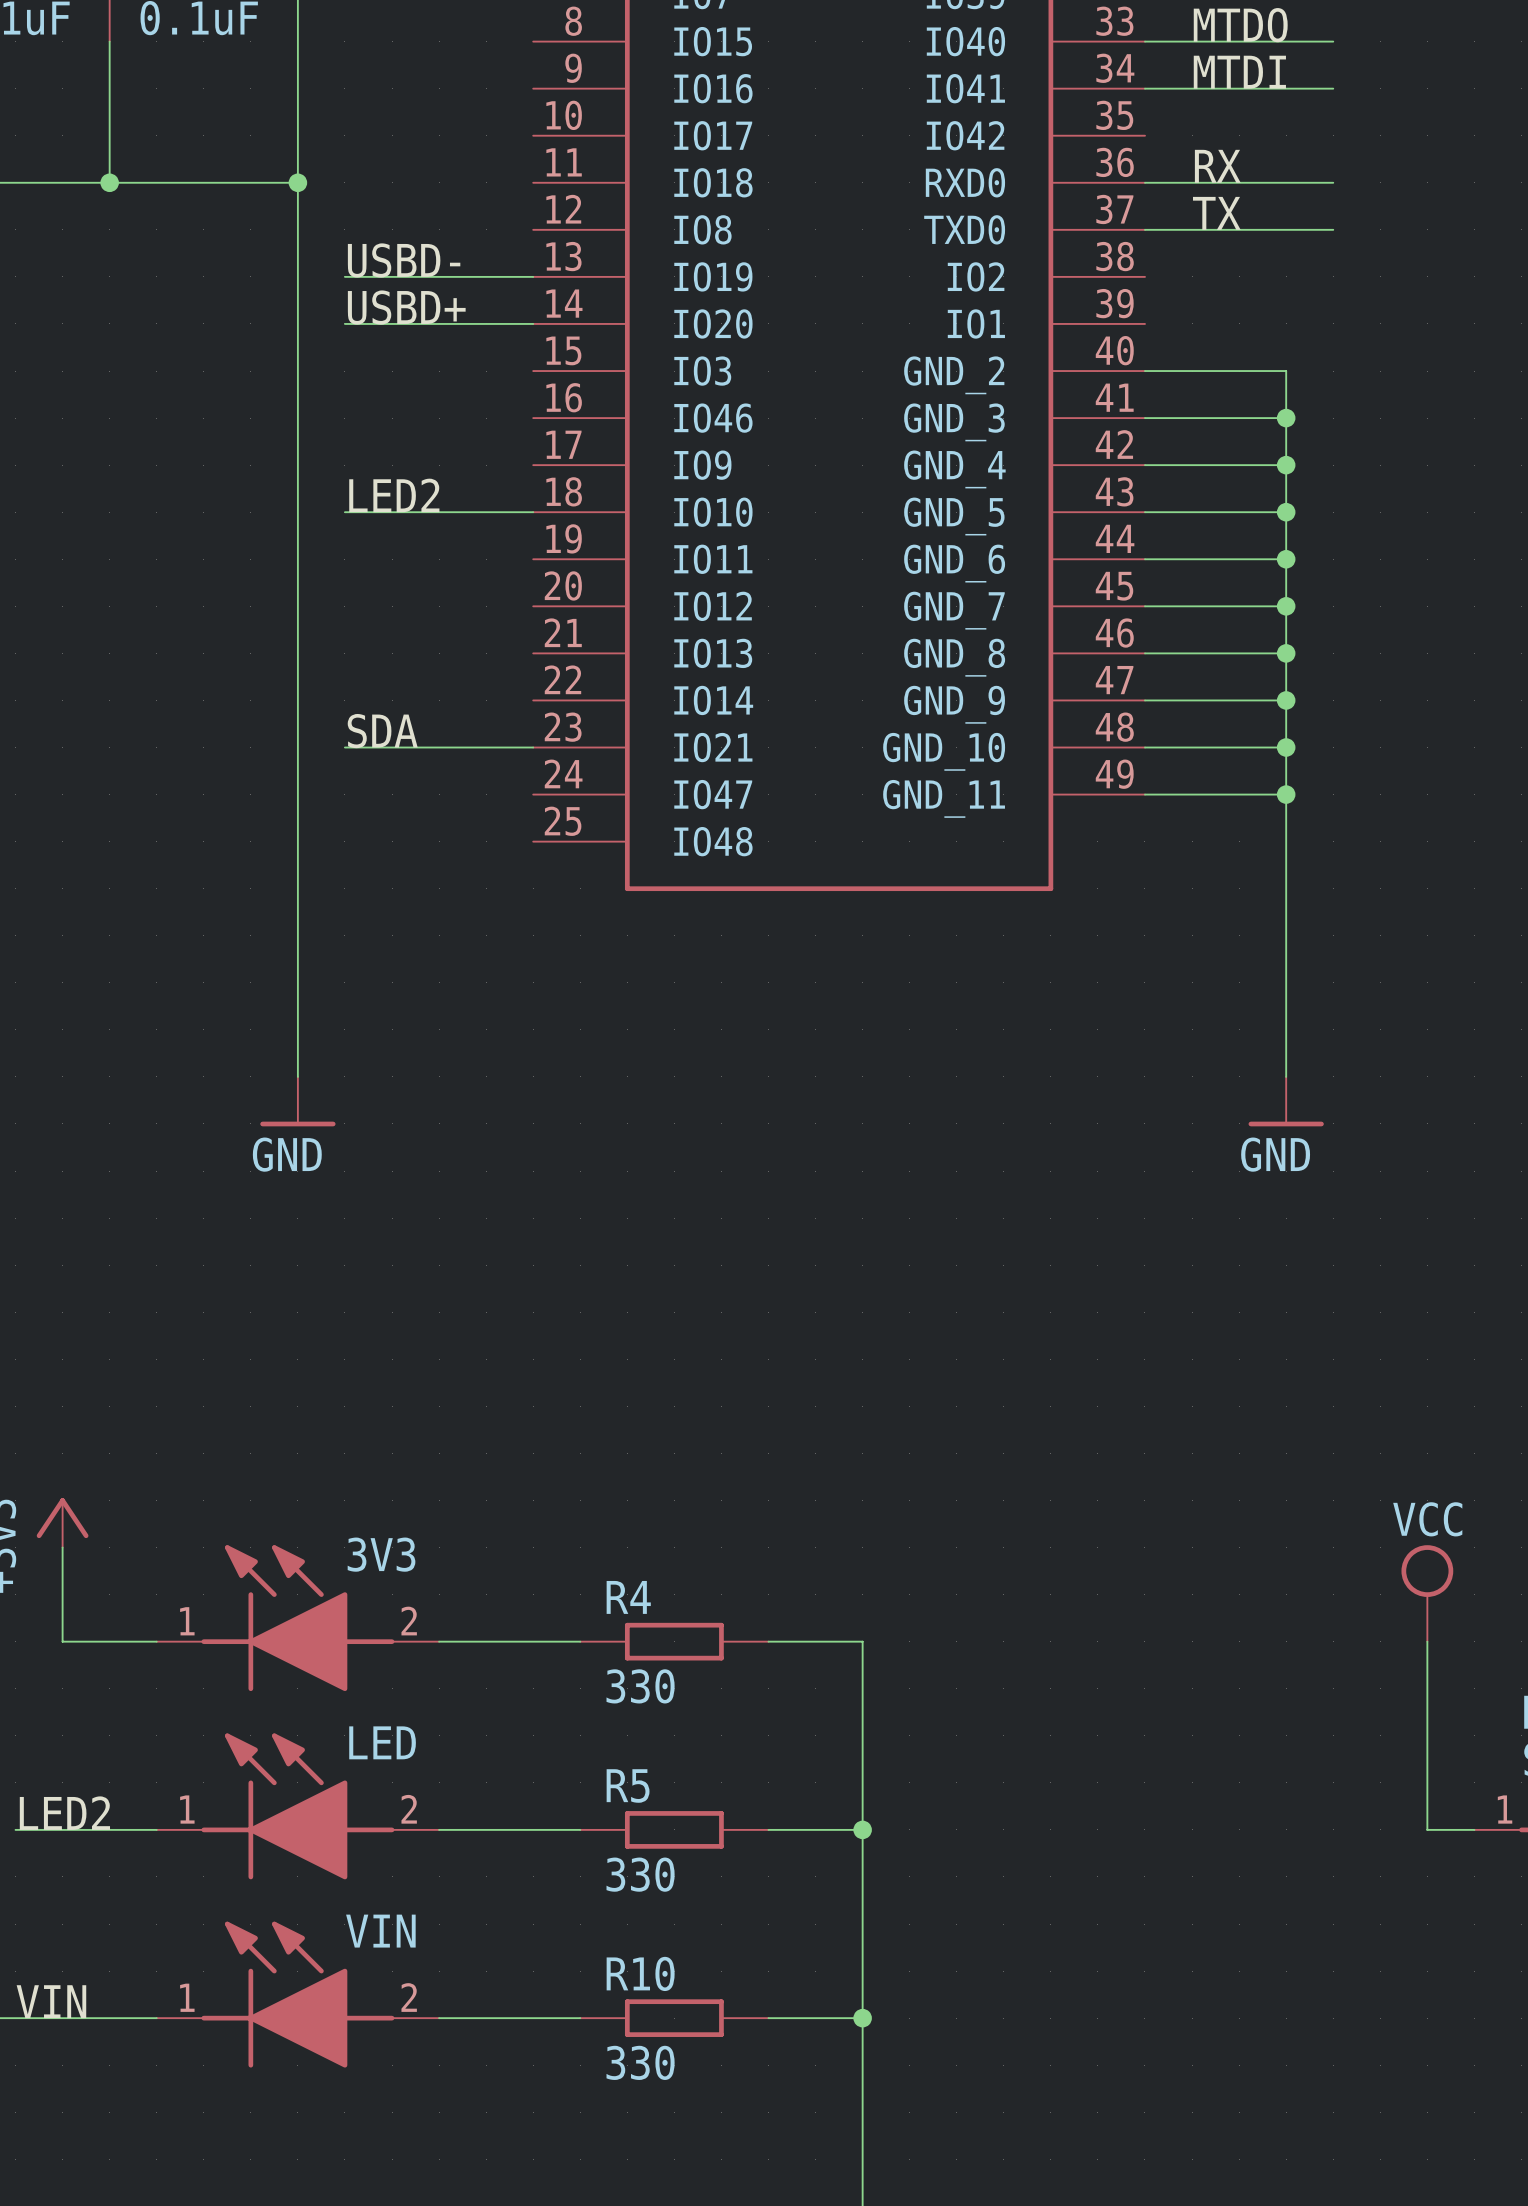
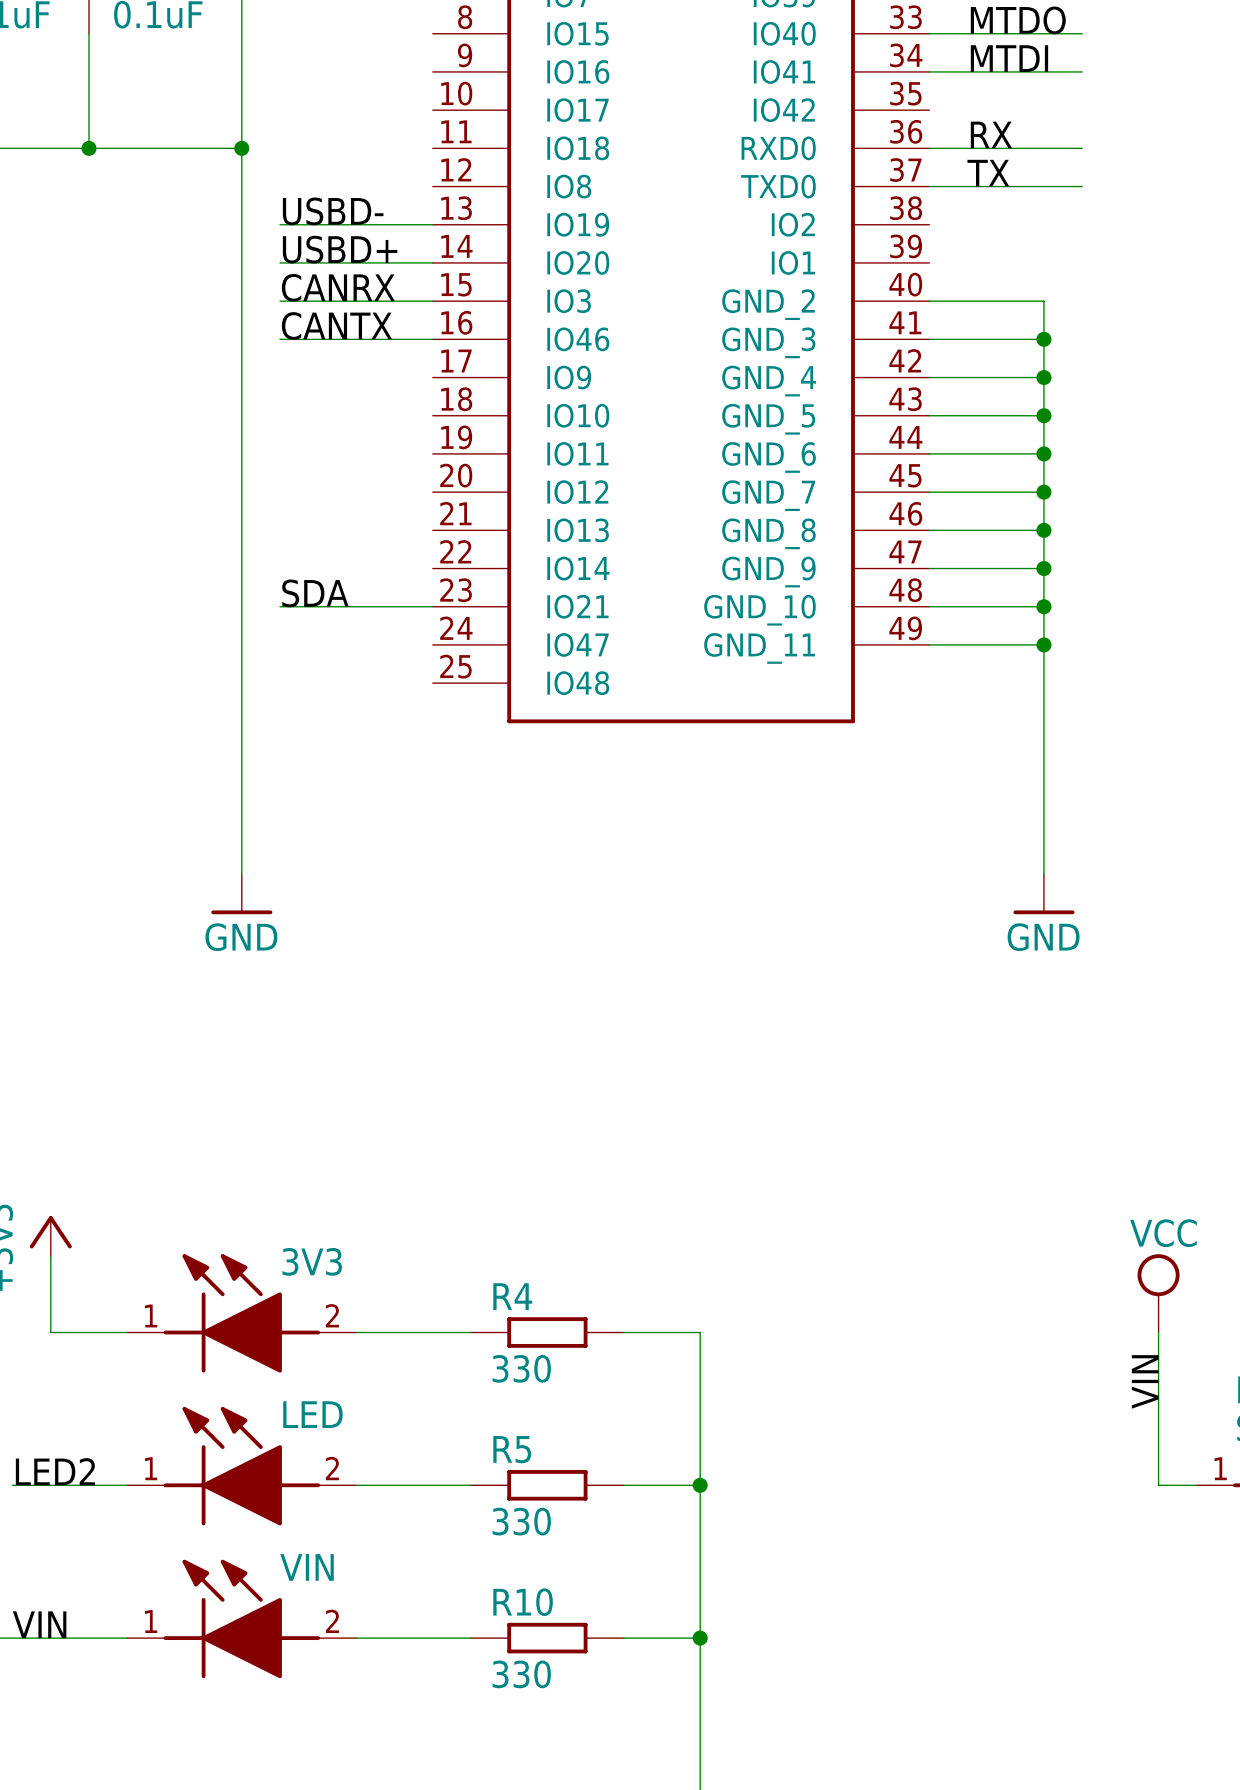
label: none -> CANRX (338, 287)
wire: none -> (280, 301) (432, 301)
label: none -> CANTX (336, 326)
label: LED2 (394, 495) -> none
wire: (344, 512) (533, 512) -> (280, 339) (432, 339)
label: none -> VIN (1145, 1381)

